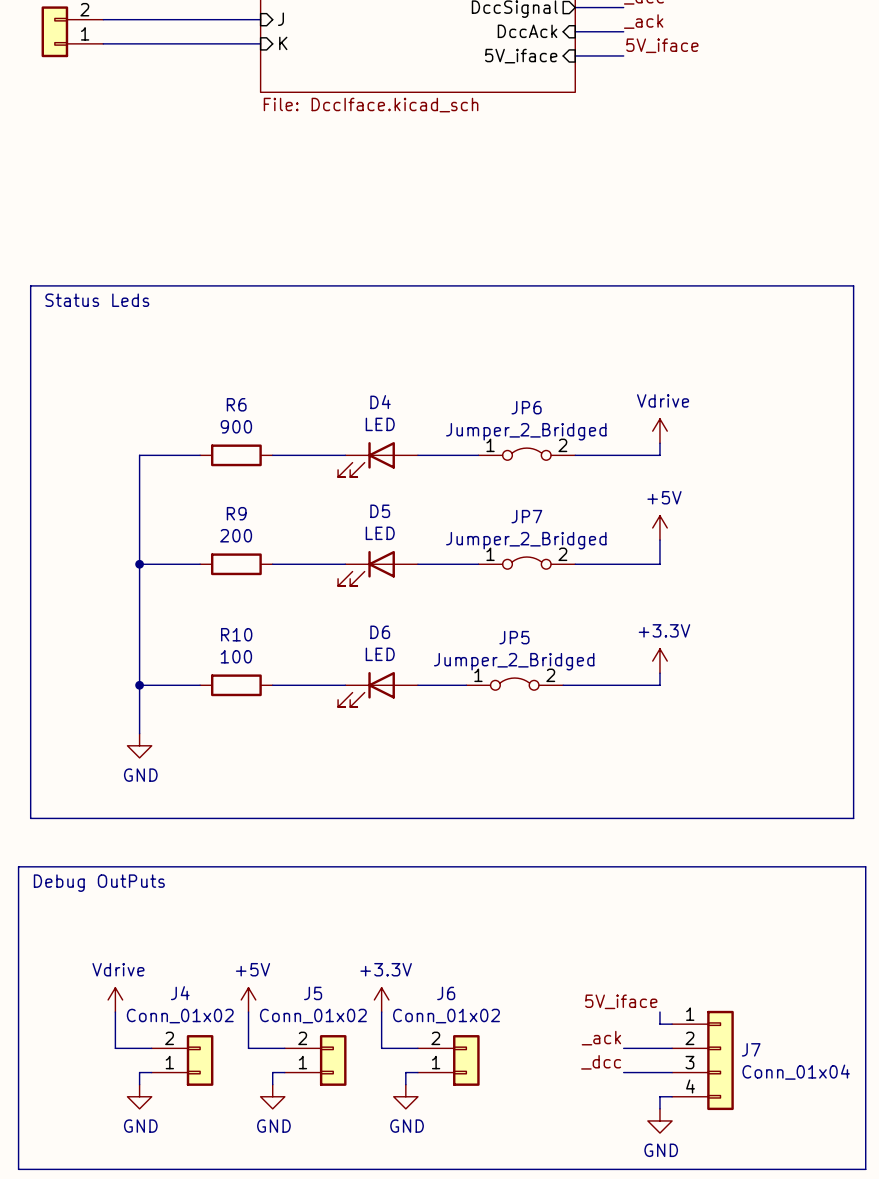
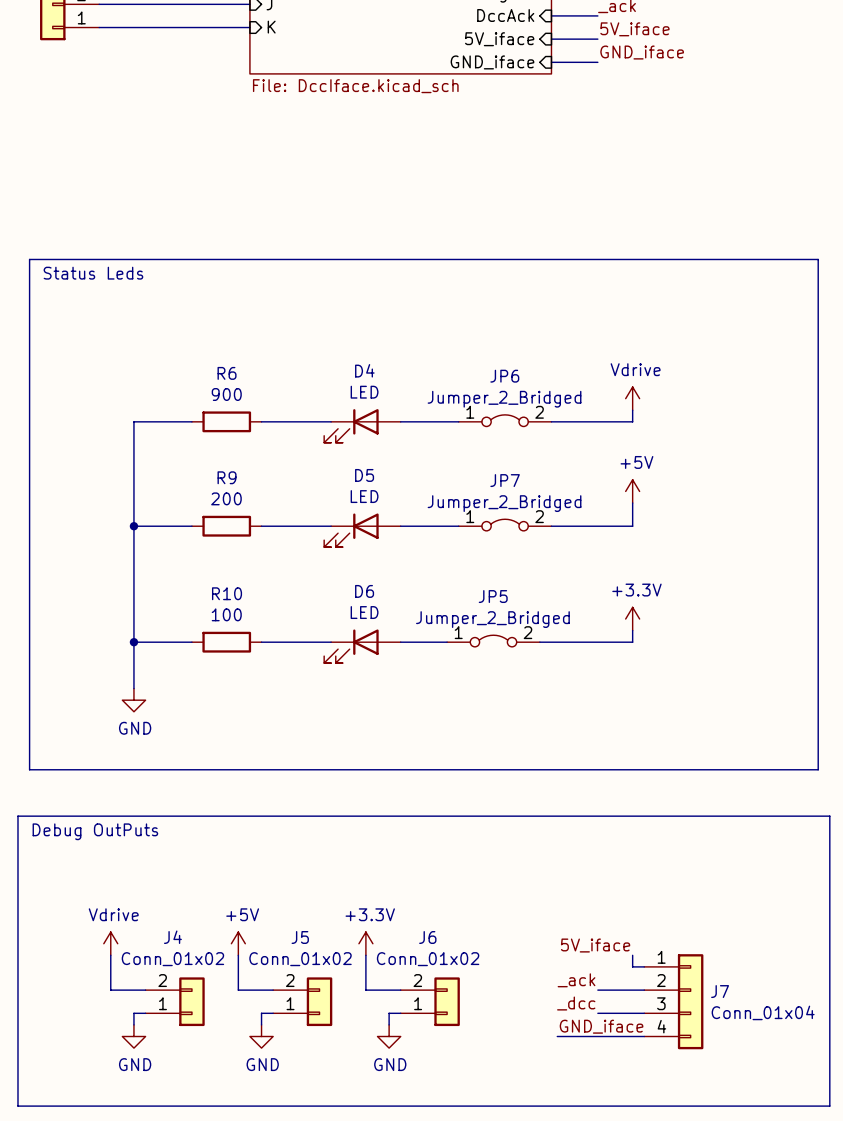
label: none -> GND_iface (642, 52)
sheet pin: none -> GND_iface (492, 62)
wire: none -> (551, 62) (597, 62)
label: none -> GND_iface (601, 1026)
wire: (659, 1096) (659, 1108) -> (632, 1036) (557, 1036)
power symbol: GND (659, 1120) -> none

